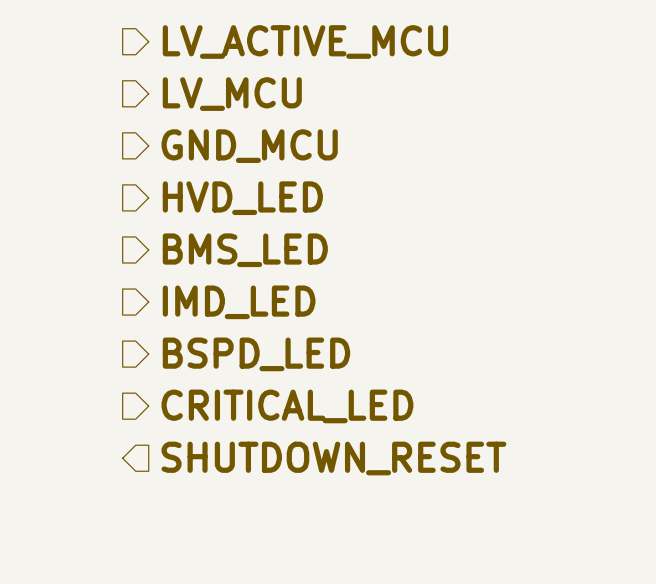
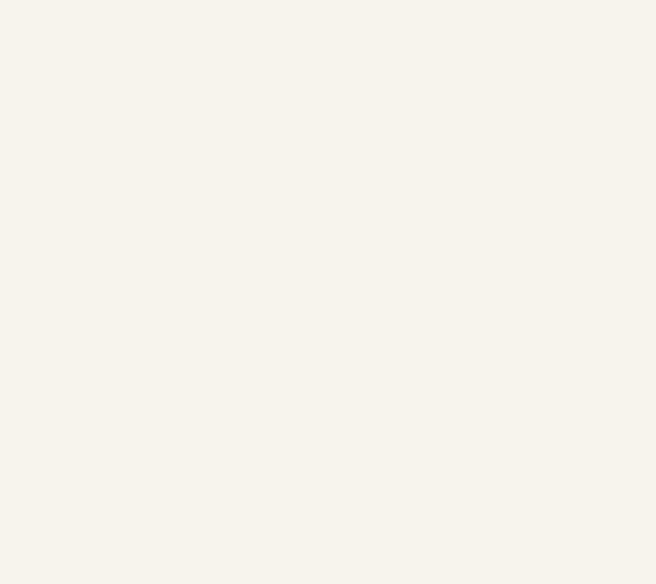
hierarchical label: LV_ACTIVE_MCU (305, 42) -> none
hierarchical label: LV_MCU (232, 94) -> none
hierarchical label: GND_MCU (249, 146) -> none
hierarchical label: HVD_LED (242, 198) -> none
hierarchical label: BMS_LED (245, 250) -> none
hierarchical label: IMD_LED (239, 302) -> none
hierarchical label: BSPD_LED (256, 354) -> none
hierarchical label: CRITICAL_LED (287, 406) -> none
hierarchical label: SHUTDOWN_RESET (333, 458) -> none

